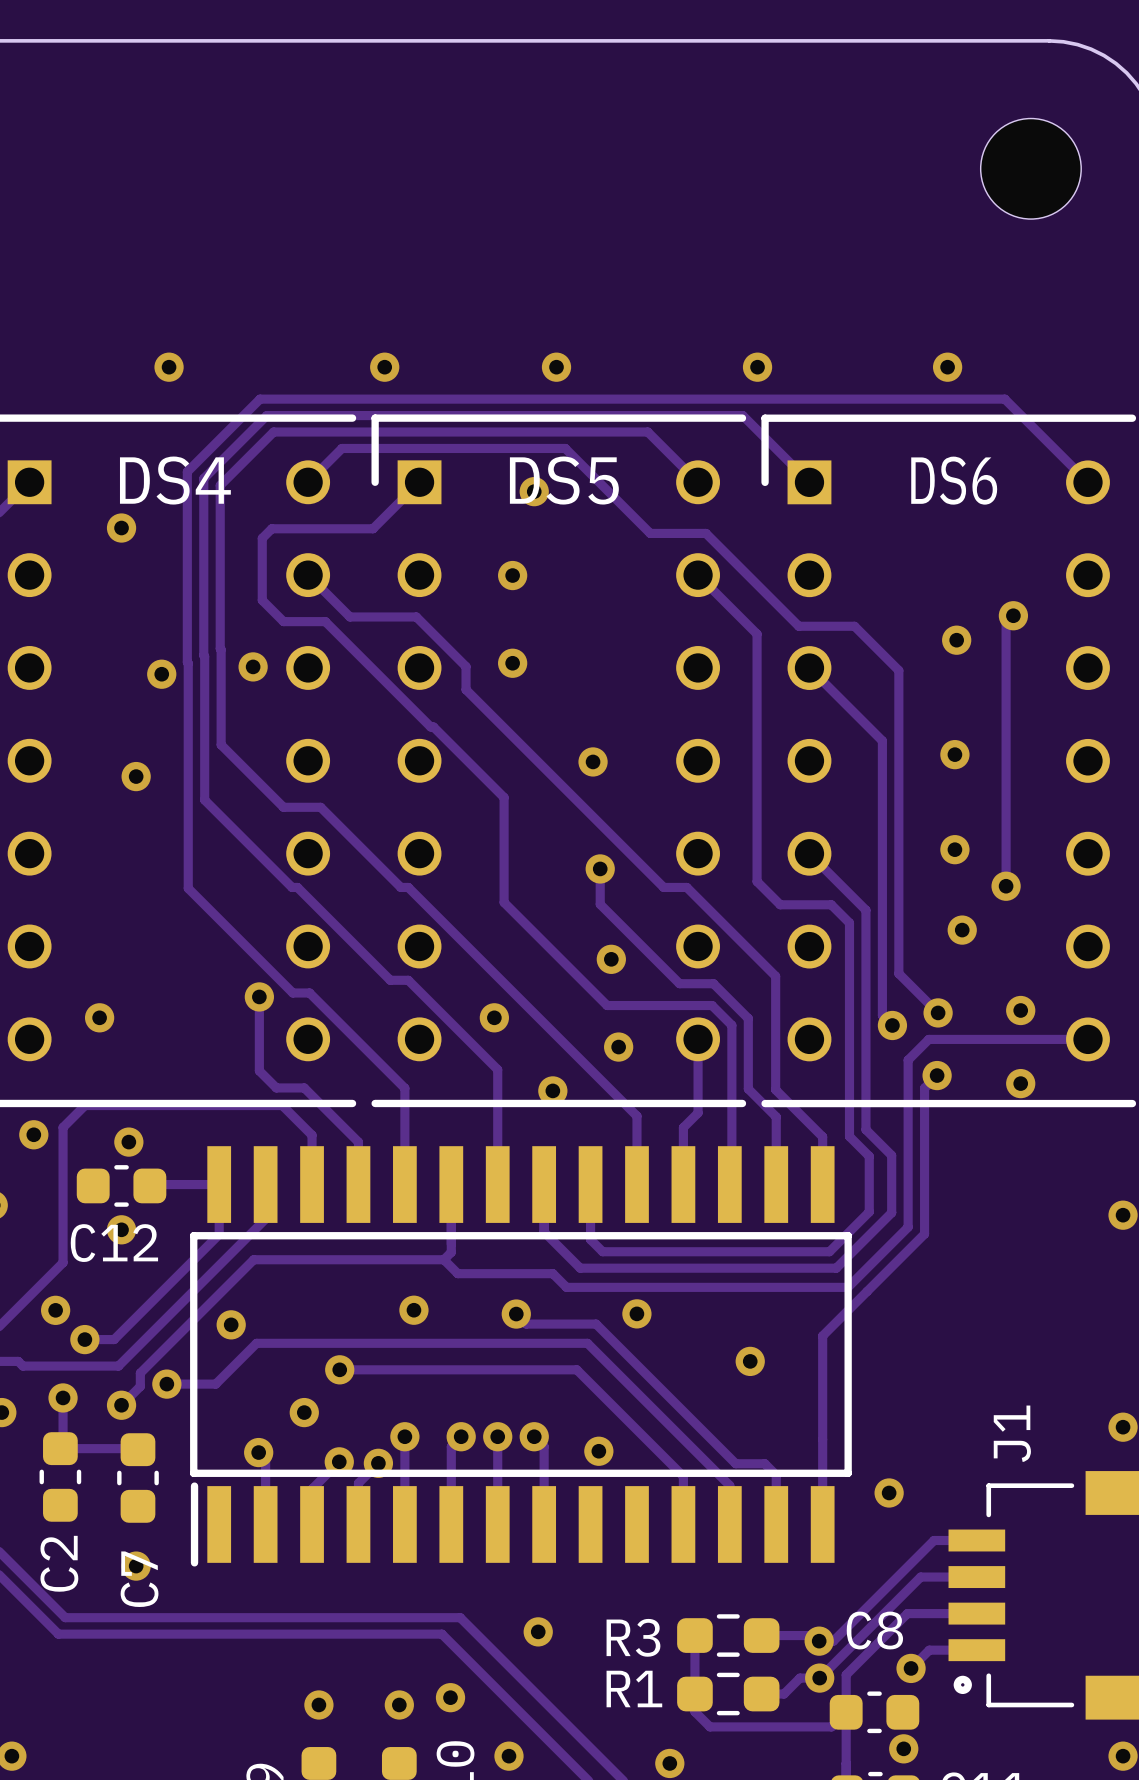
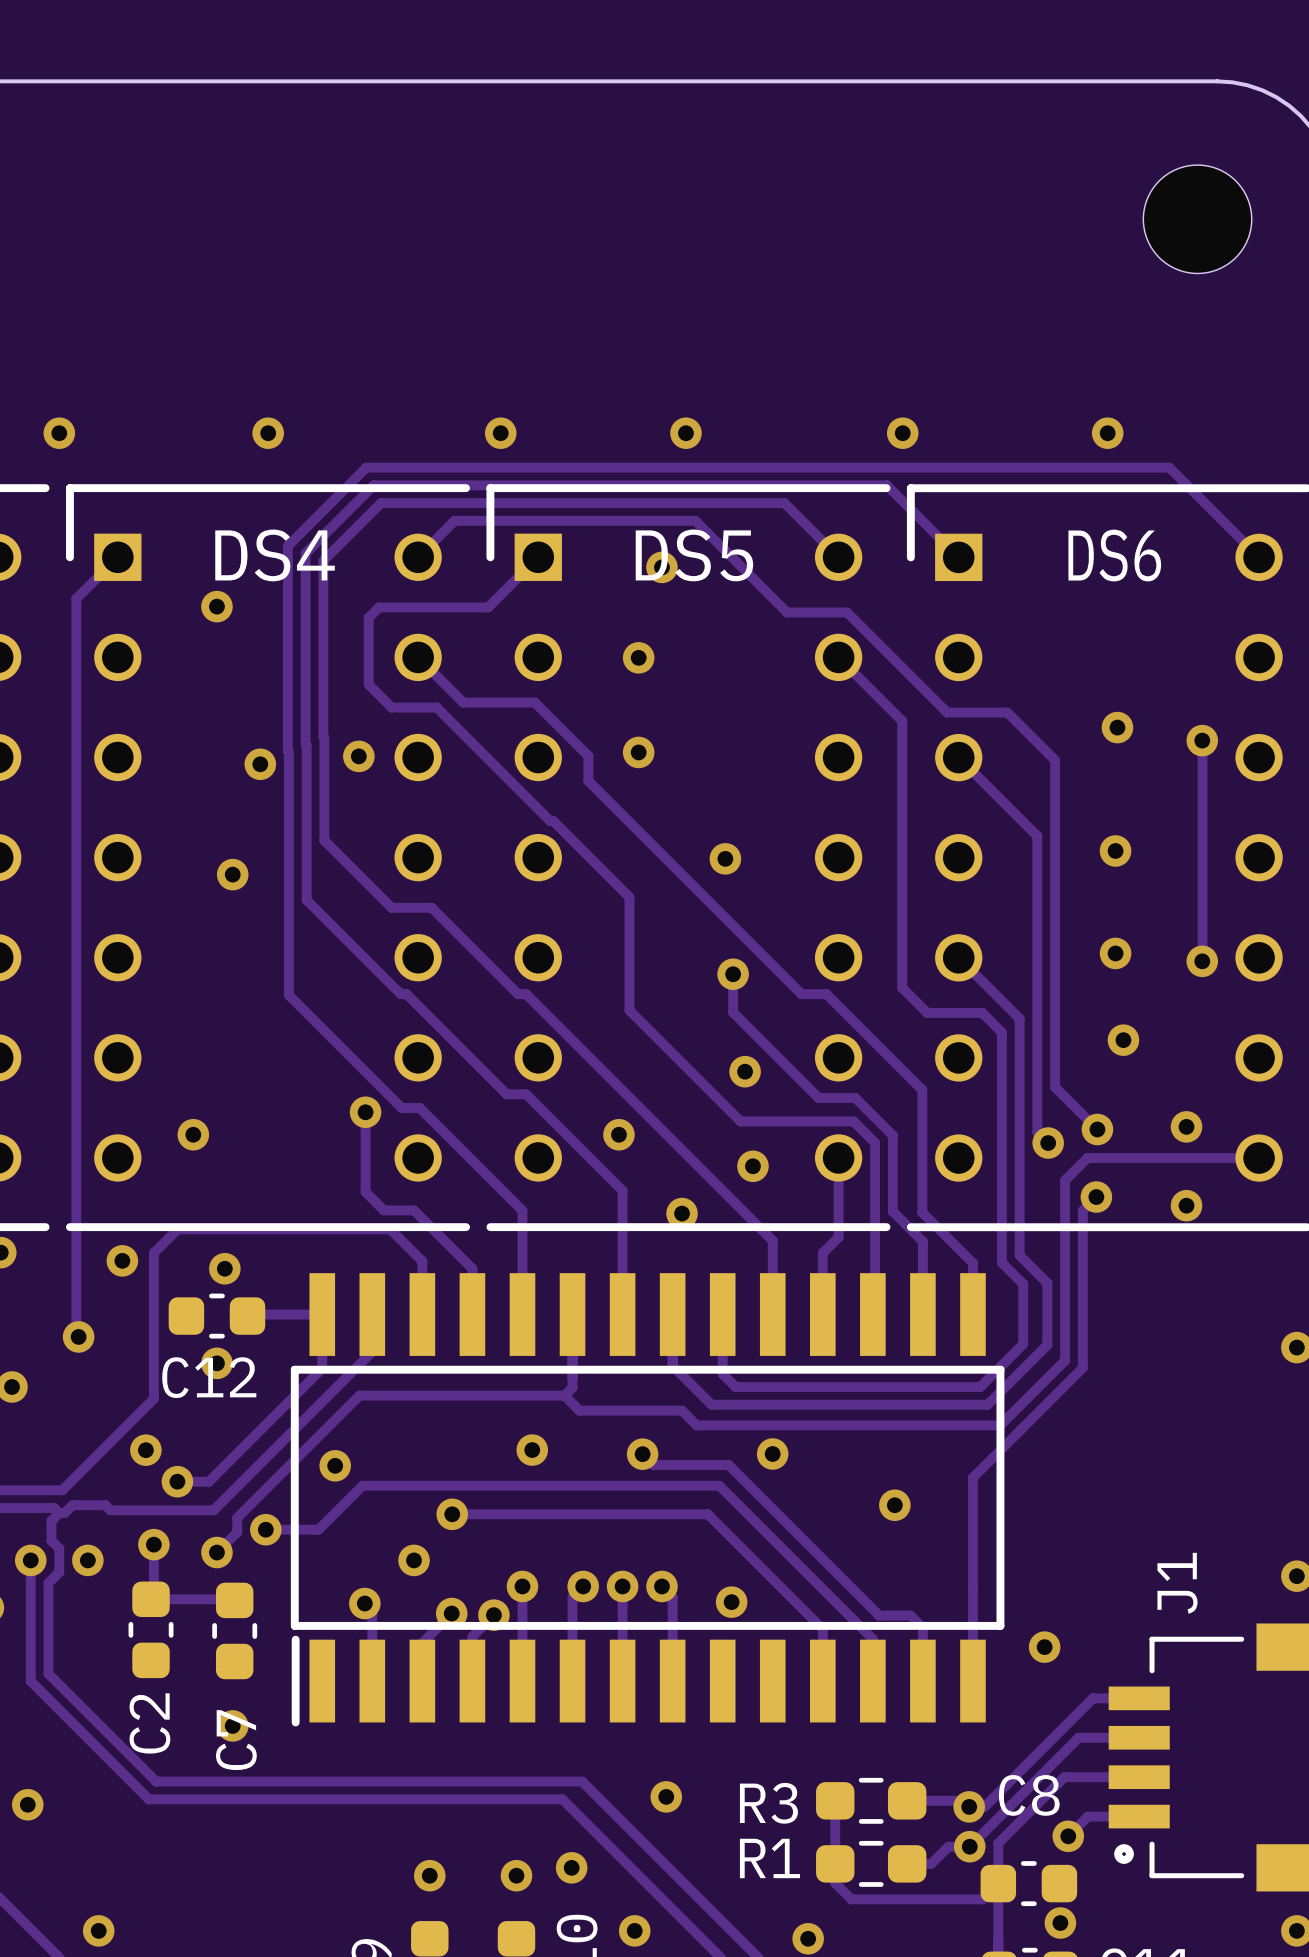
track: (1013, 615) (1006, 623) (1006, 886) -> none
via position: (1013, 615) -> (1202, 740)
track: none -> (1202, 740) (1202, 961)
via position: (1006, 886) -> (1202, 961)

